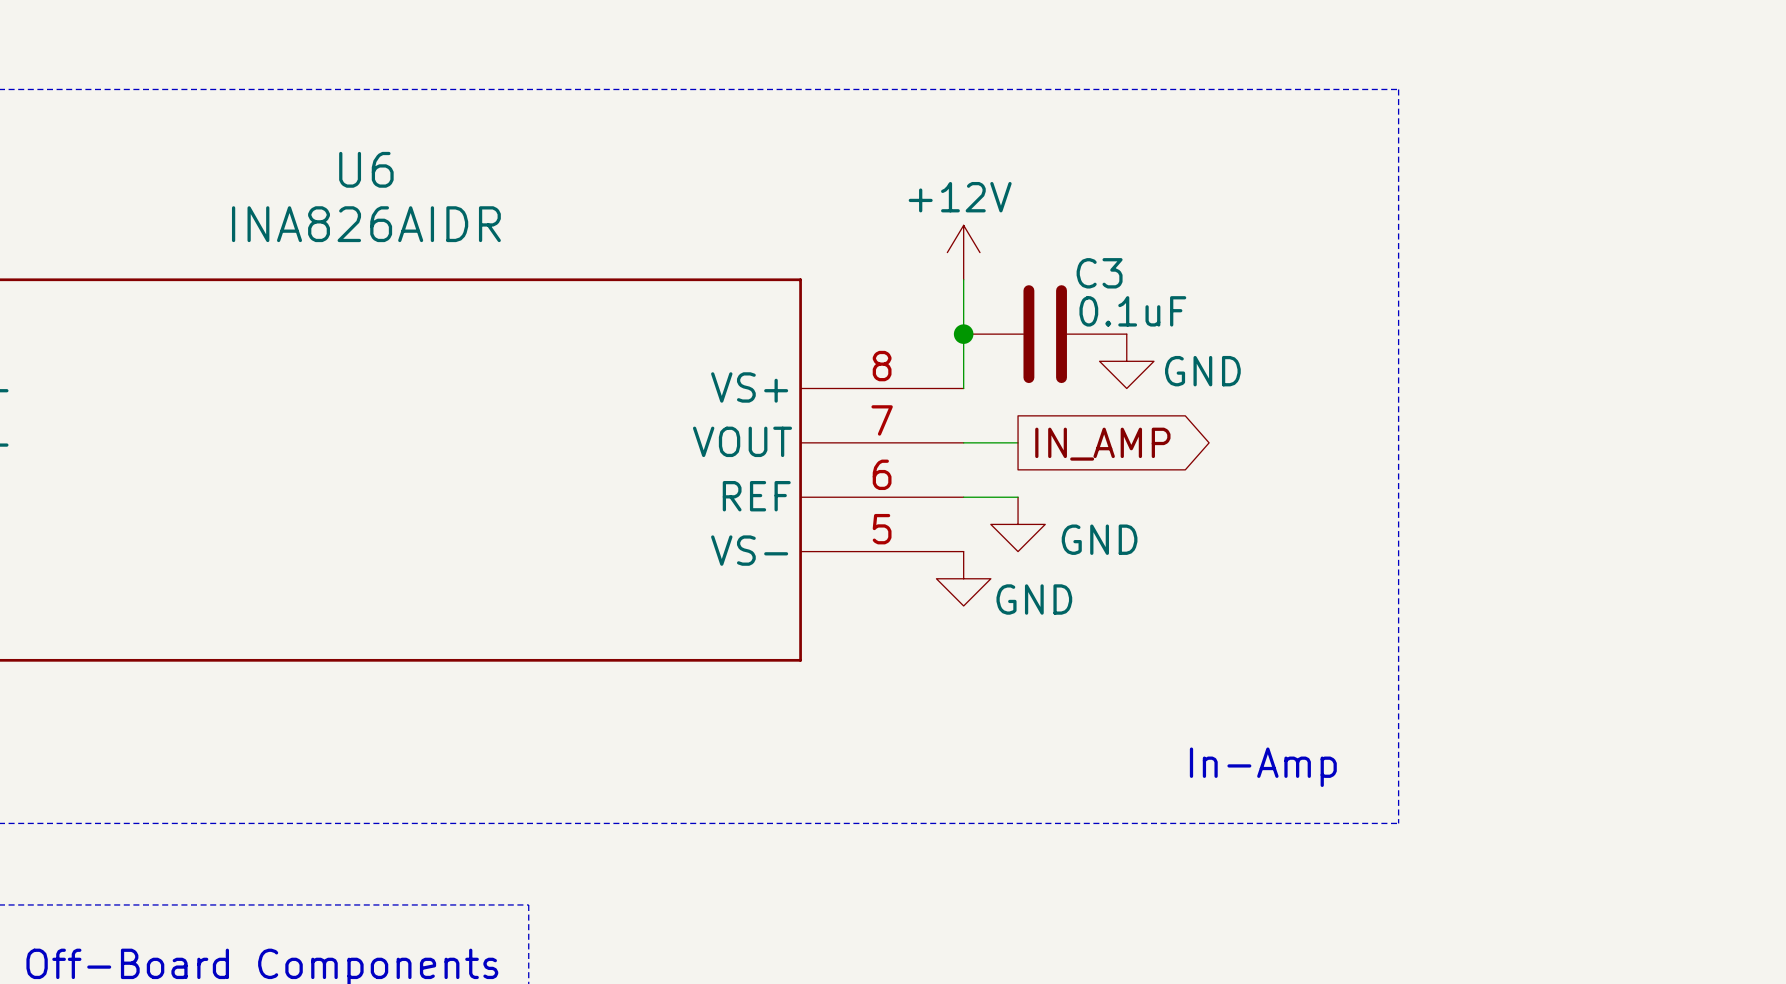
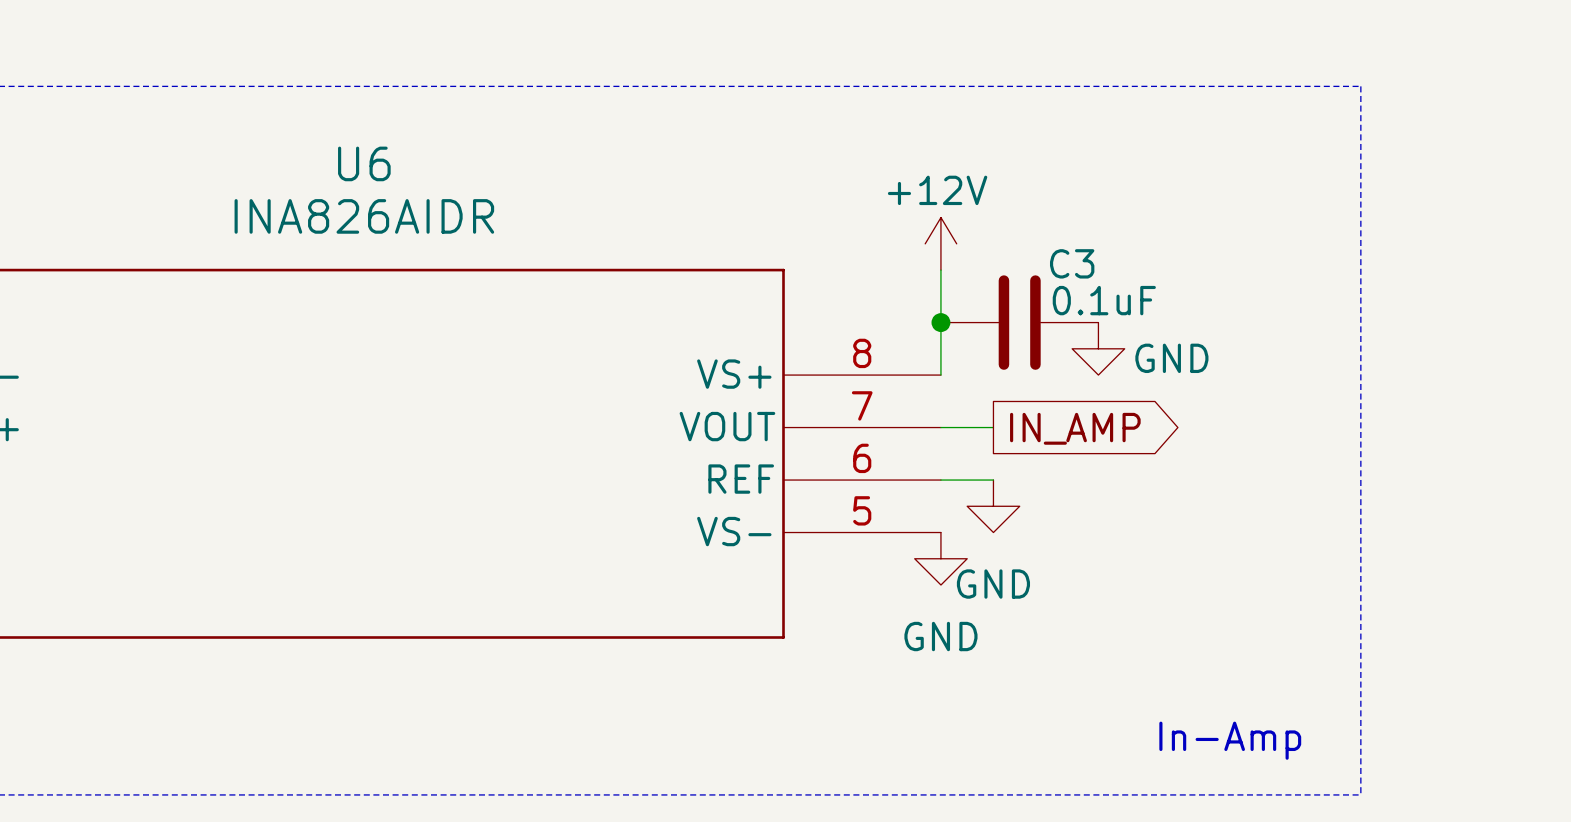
power symbol text position: GND (1099, 539) -> GND (993, 584)
power symbol text position: GND (1034, 599) -> GND (940, 636)

